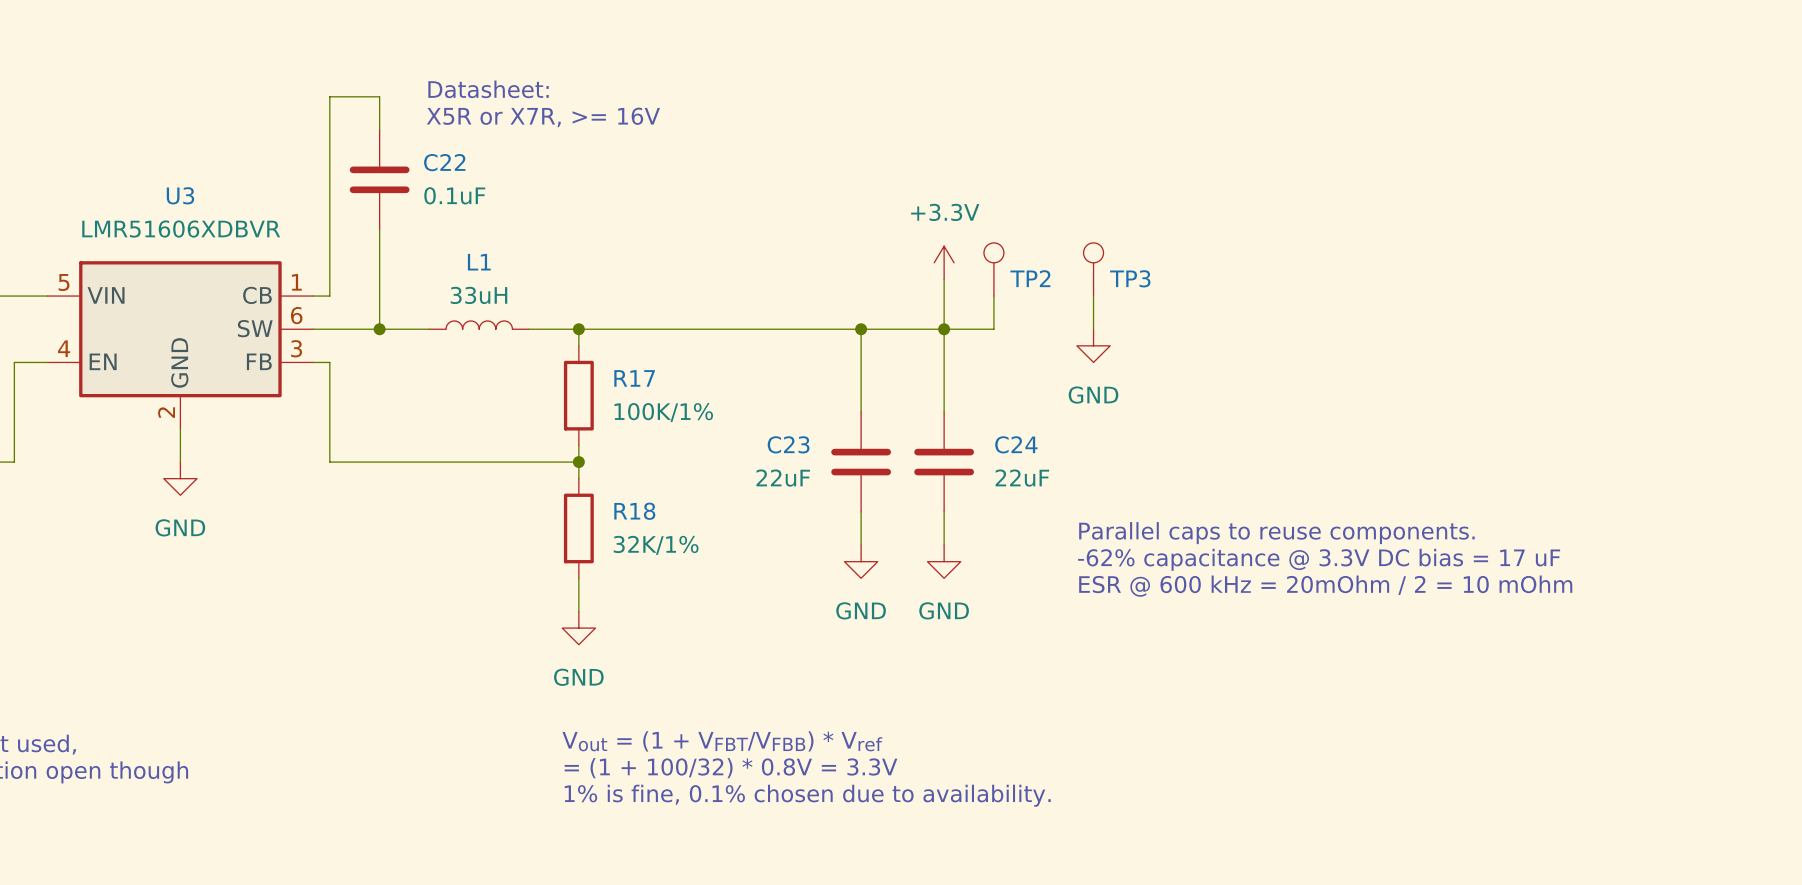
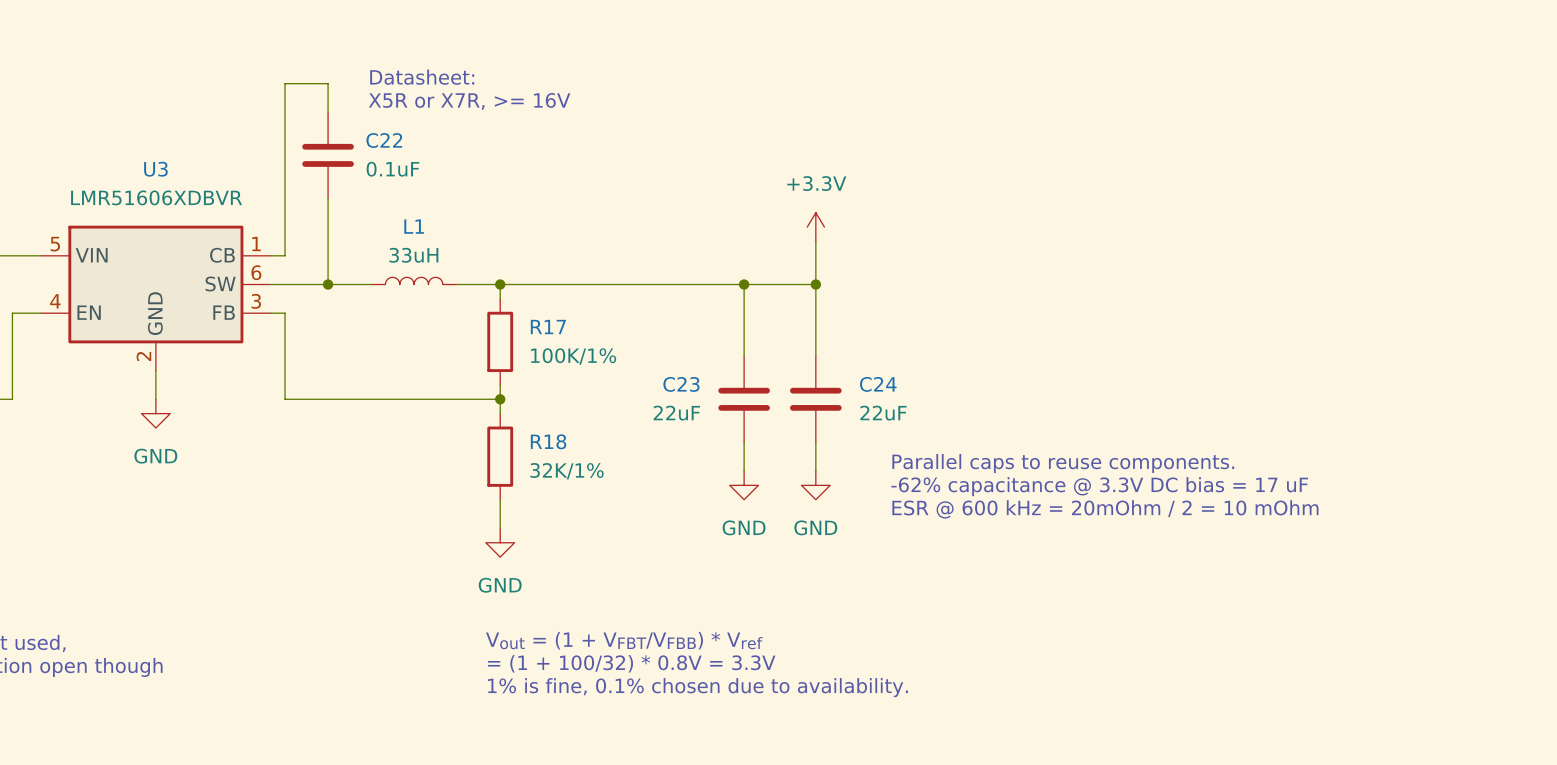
TP2: (993, 269) -> none
TP3: (1093, 269) -> none
wire: (993, 296) (993, 329) (944, 329) -> none
wire: (1093, 296) (1093, 329) -> none
power symbol: GND (1093, 345) -> none
text position: Parallel caps to reuse components. (1276, 533) -> Parallel caps to reuse components. (1063, 463)
text position: -62% capacitance @ 3.3V DC bias = 17 uF (1319, 559) -> -62% capacitance @ 3.3V DC bias = 17 uF (1099, 486)
text position: ESR @ 600 kHz = 20mOhm / 2 = 10 mOhm (1325, 586) -> ESR @ 600 kHz = 20mOhm / 2 = 10 mOhm (1105, 509)

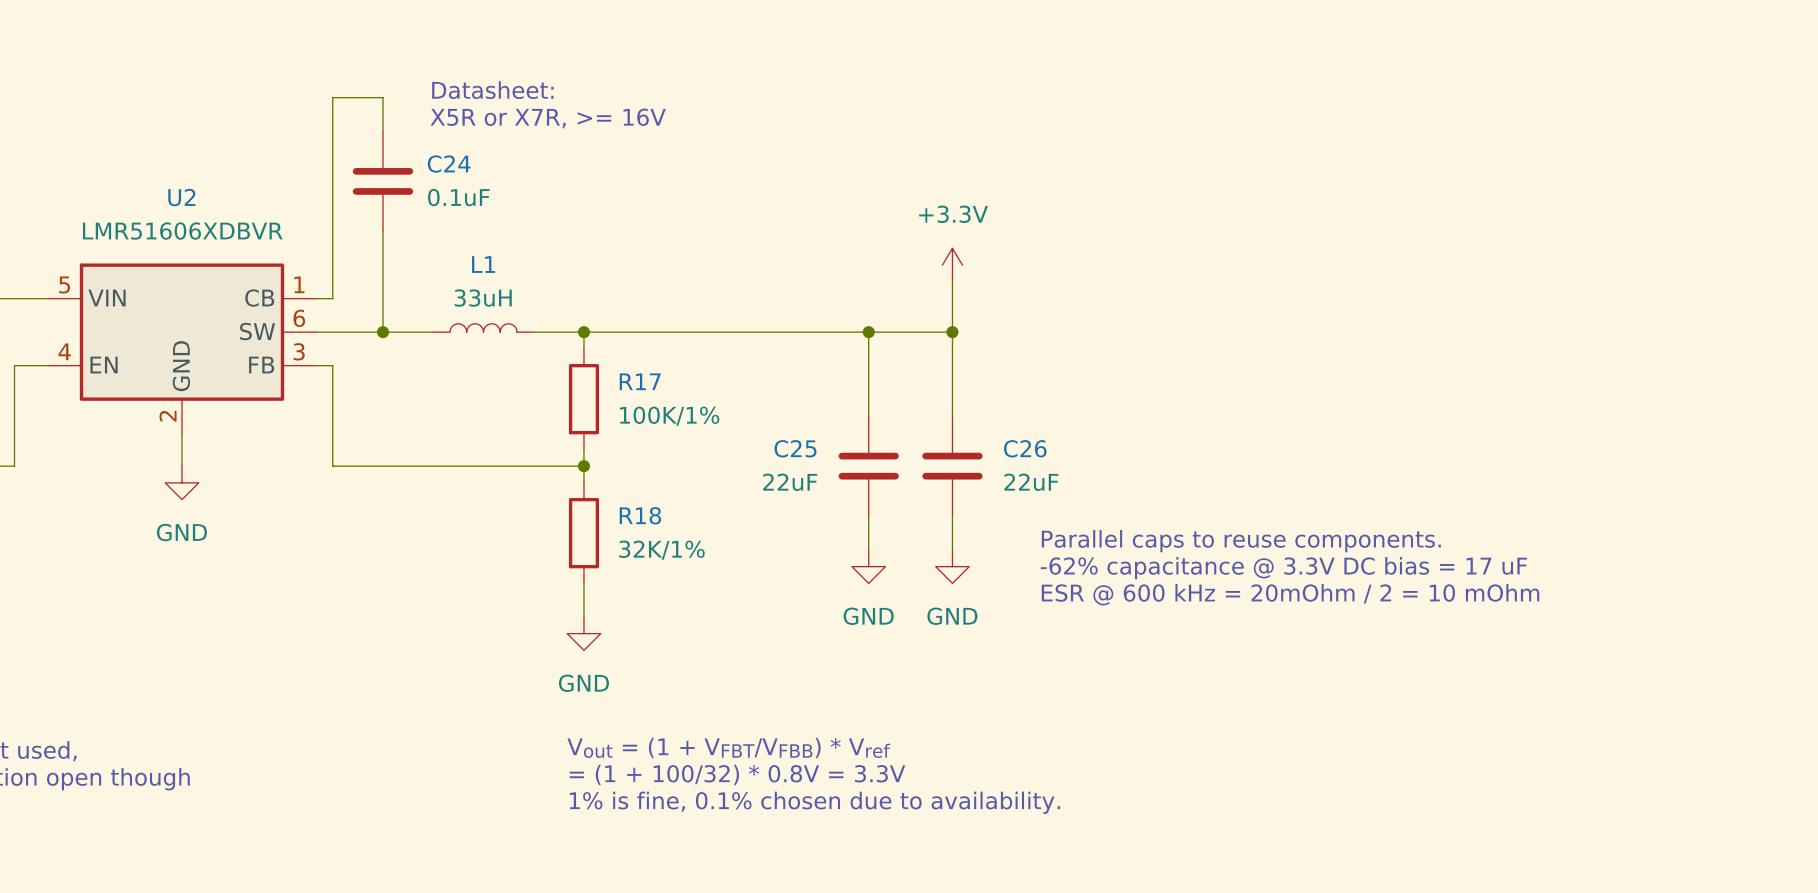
C22 name: C22 (384, 140) -> C24 (449, 164)
U3 name: U3 (155, 169) -> U2 (181, 197)
C23 name: C23 (681, 384) -> C25 (795, 448)
C24 name: C24 (878, 384) -> C26 (1025, 448)

